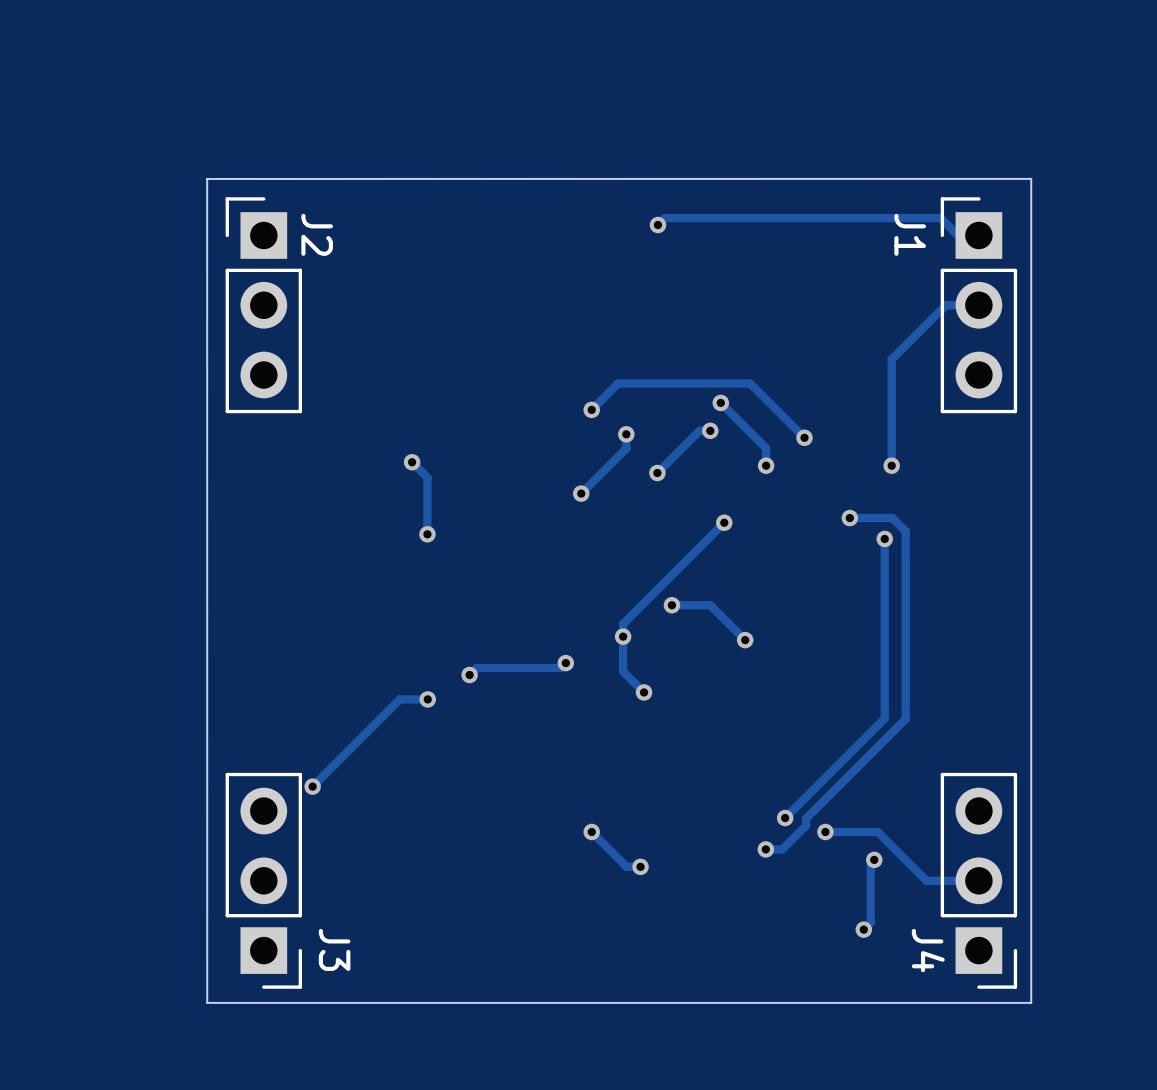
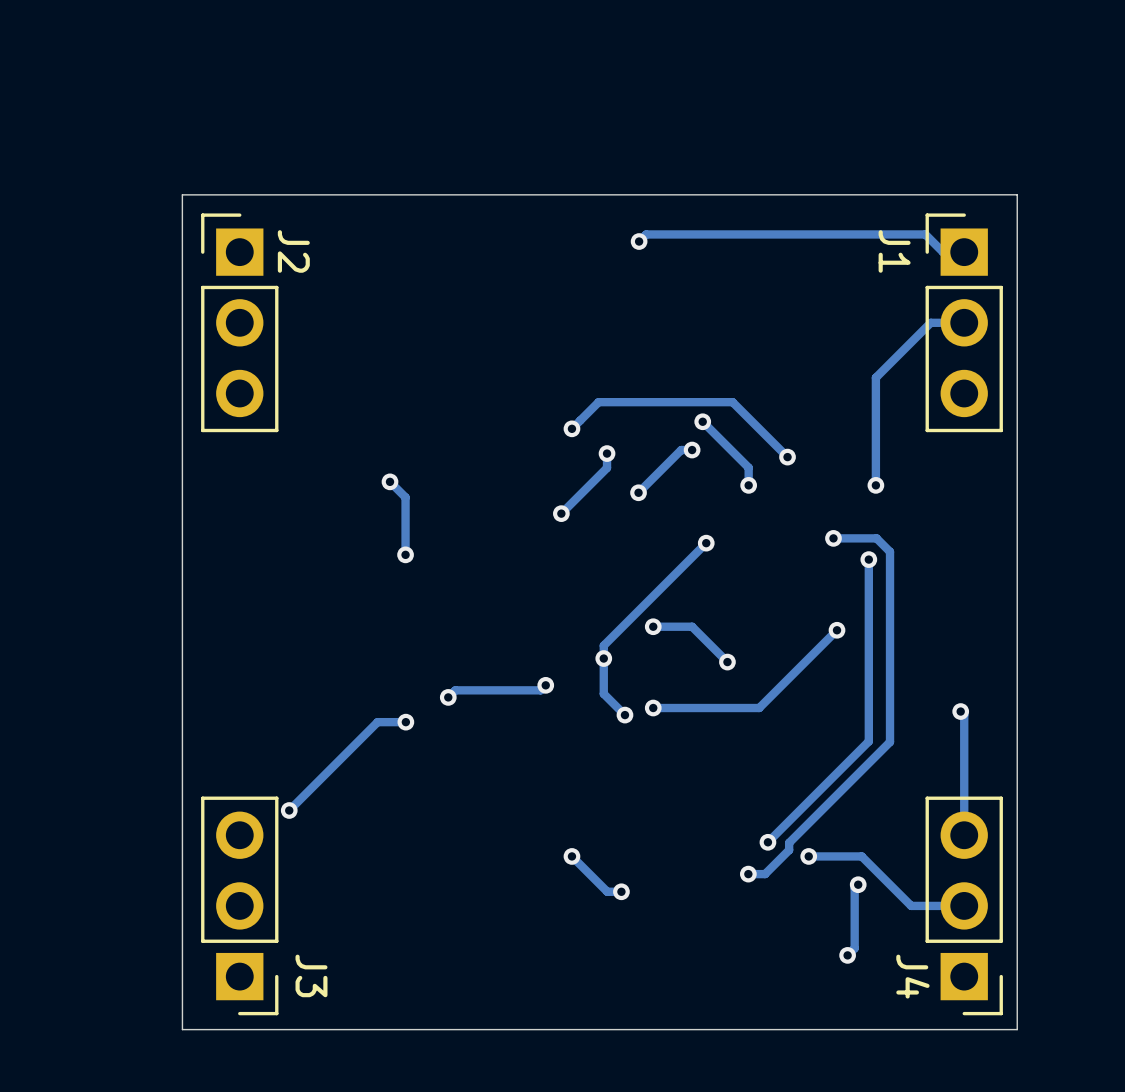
track: none -> (837, 630) (759, 708) (653, 708)
via: none -> (837, 630)
via: none -> (653, 708)
track: none -> (960, 711) (964, 715) (964, 835)
via: none -> (960, 711)

